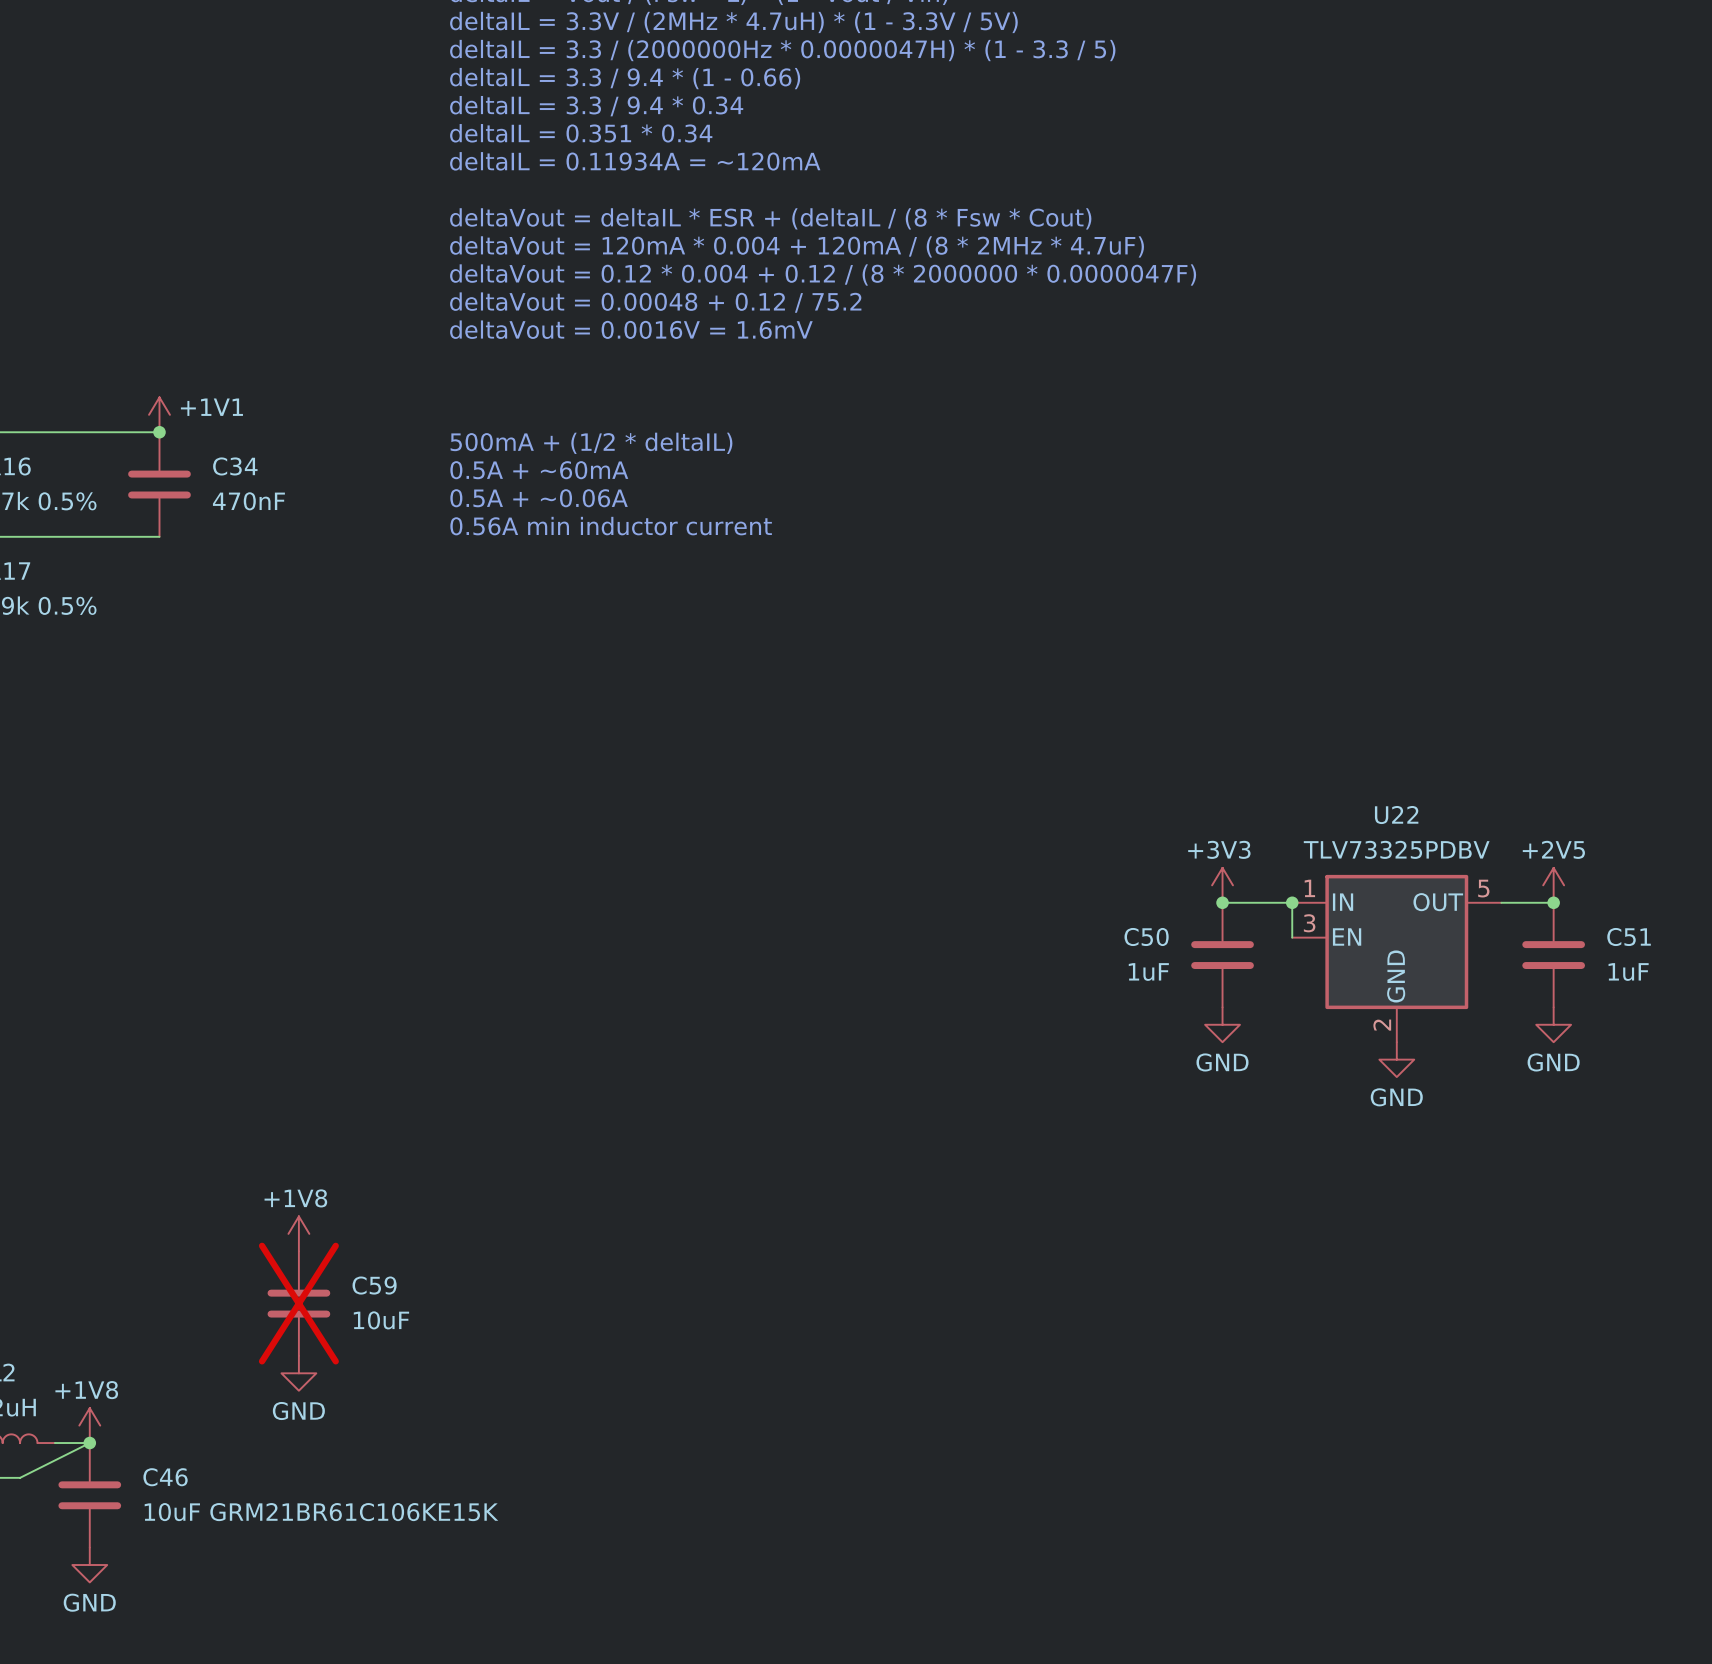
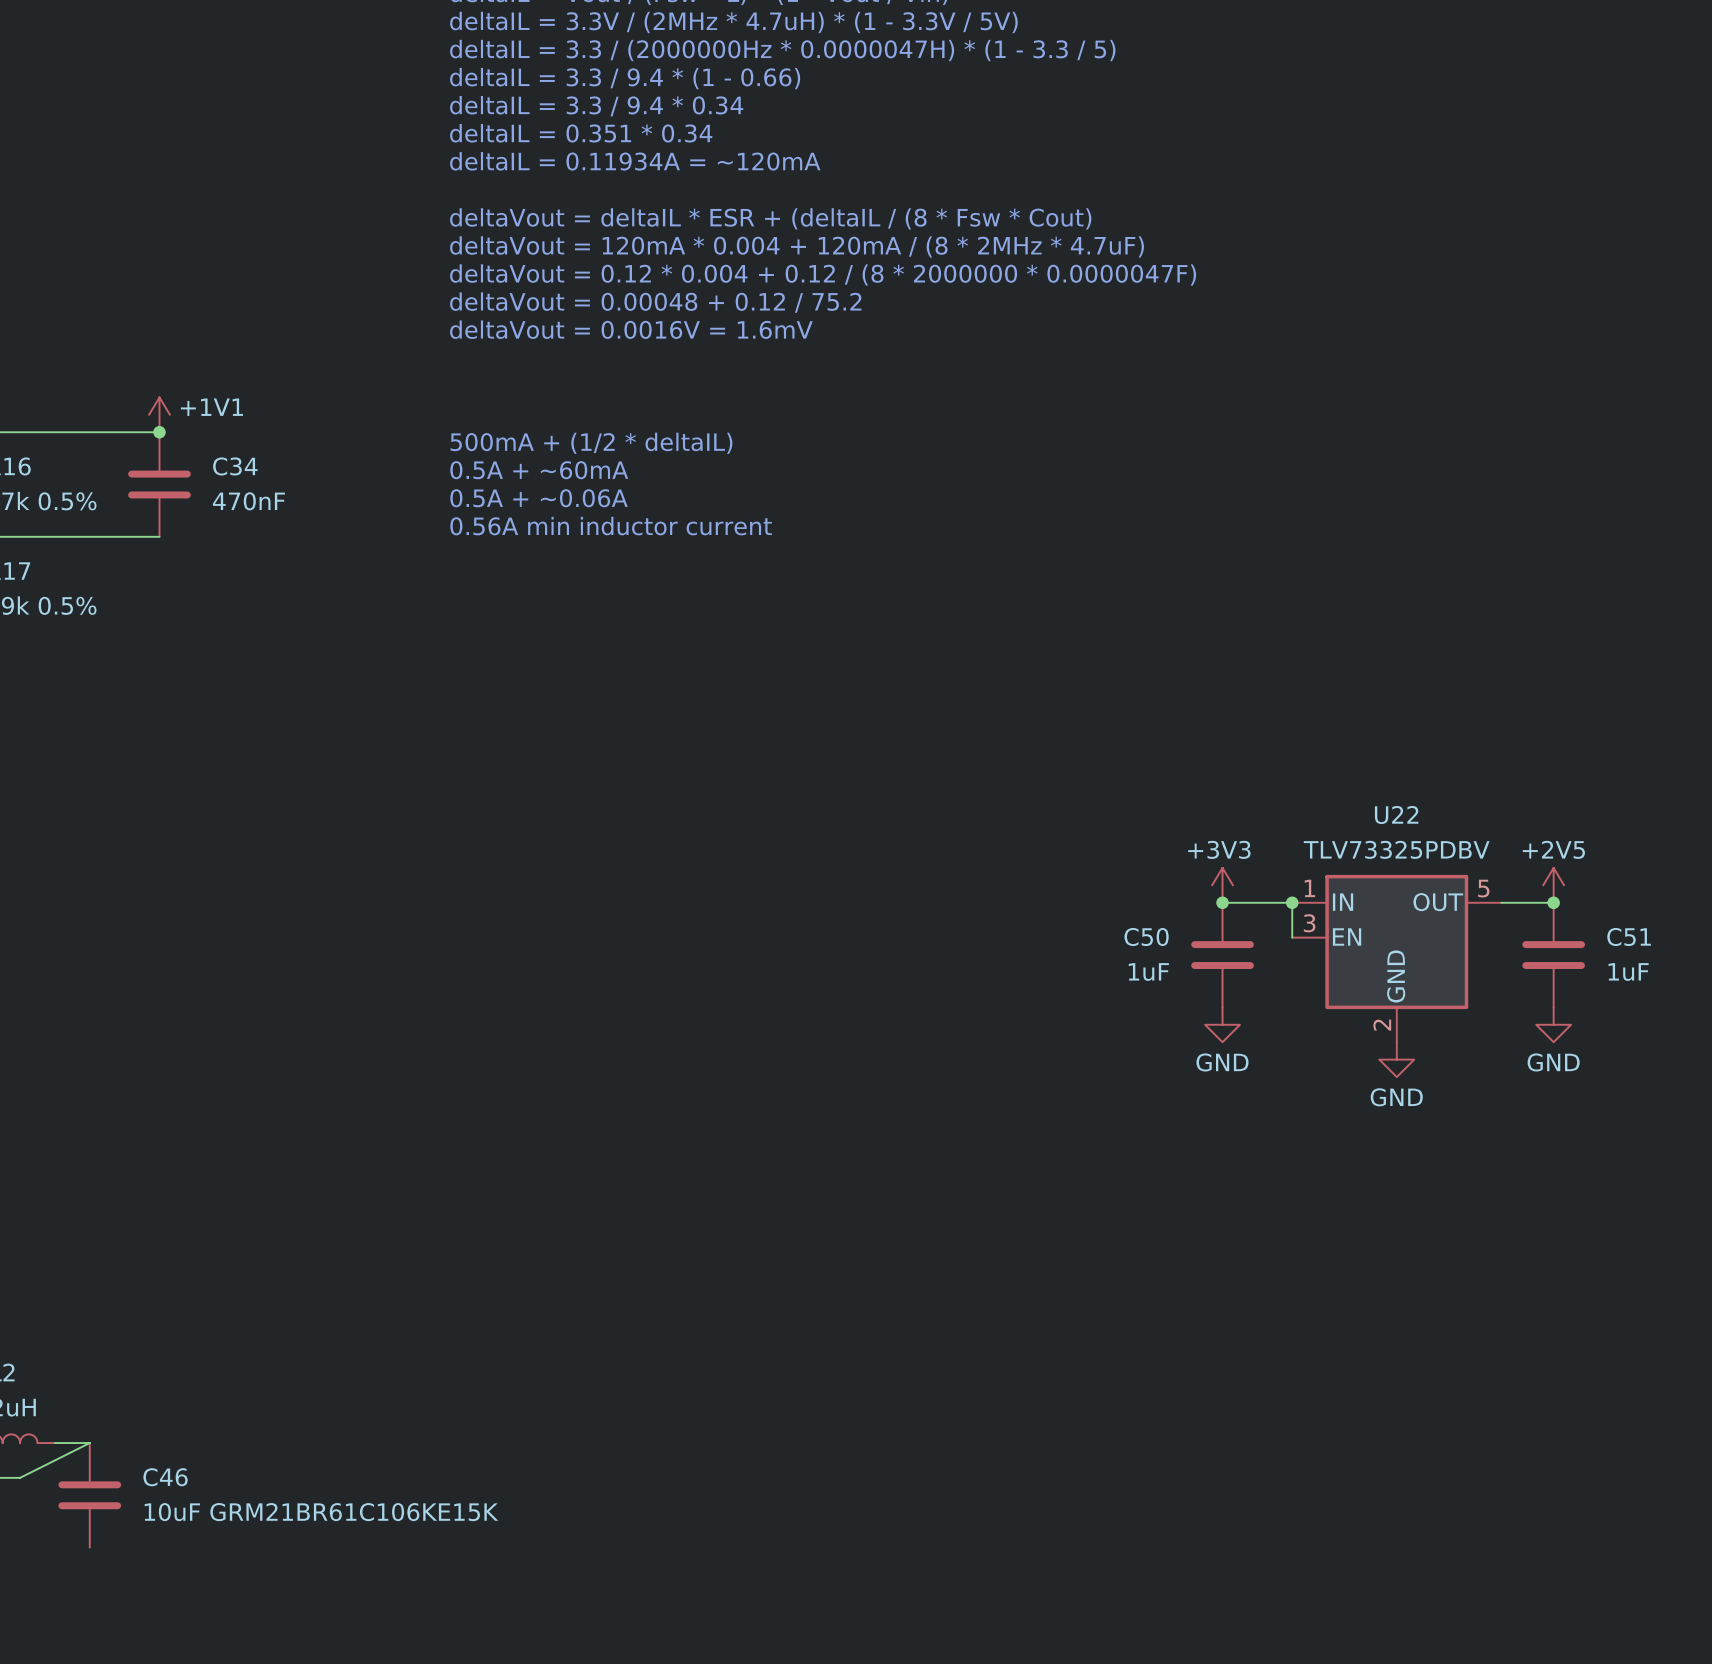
power symbol: +1V8 (298, 1233) -> none
C59: 10uF (298, 1303) -> none
power symbol: GND (298, 1373) -> none
power symbol: +1V8 (89, 1425) -> none
junction: (89, 1443) -> none
power symbol: GND (89, 1565) -> none

